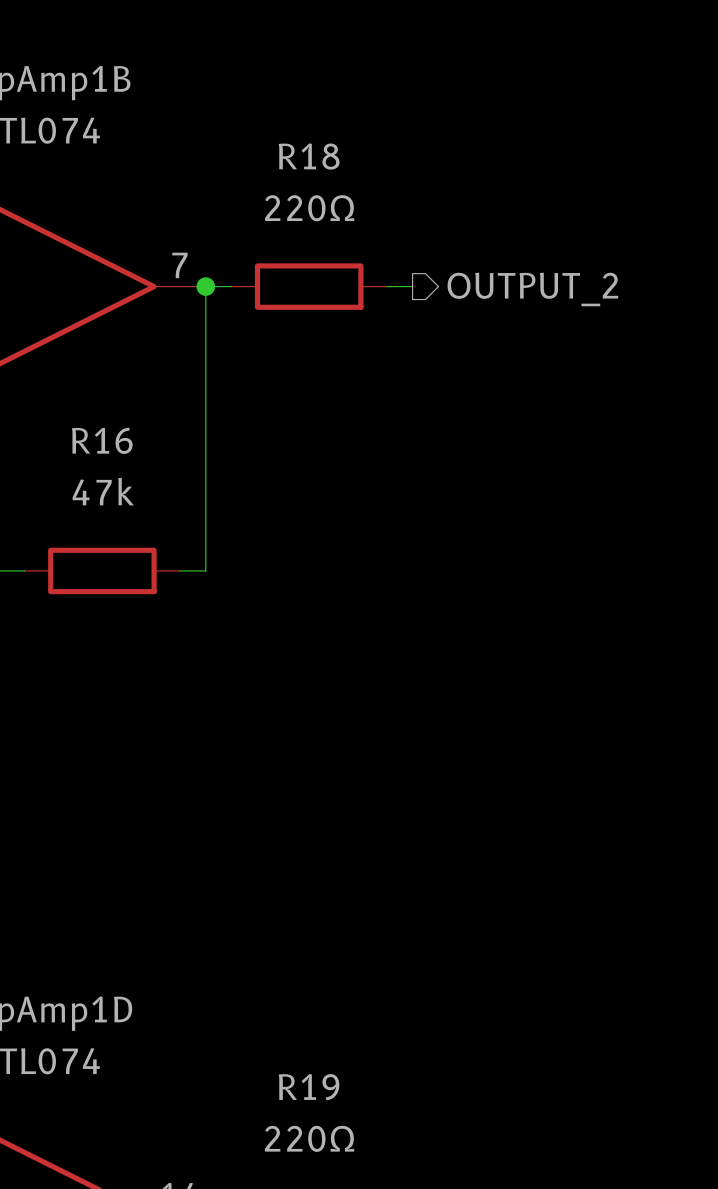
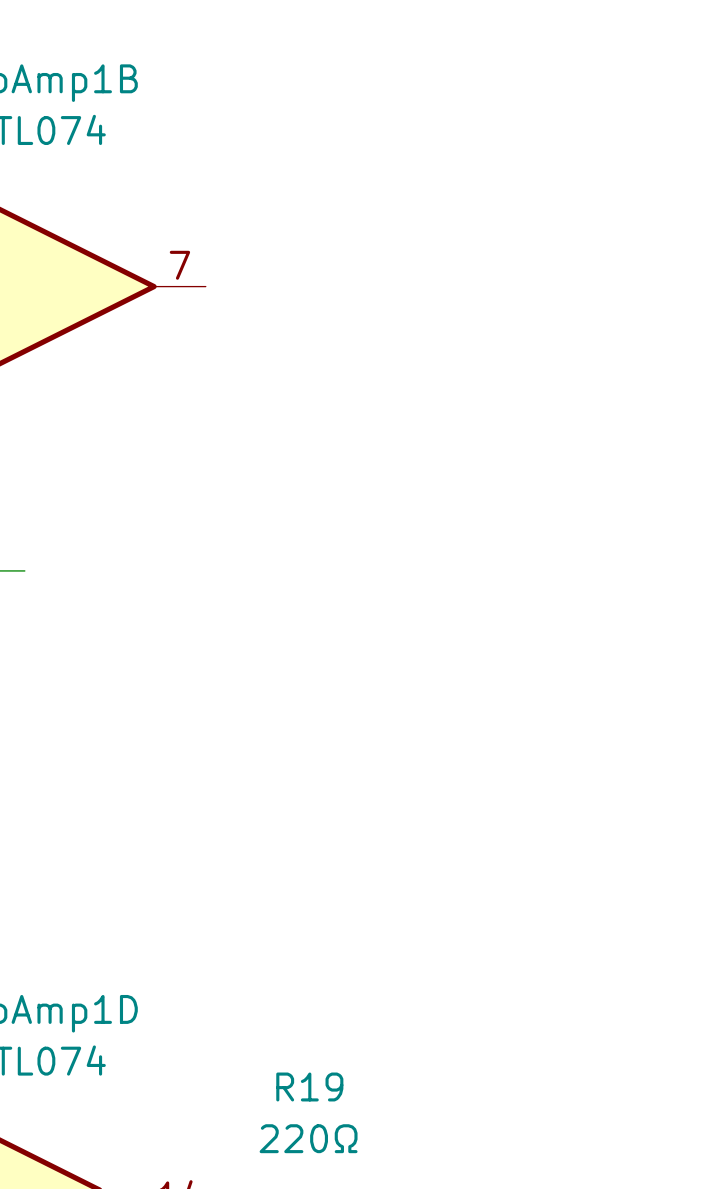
junction: (205, 286) -> none
wire: (231, 286) (205, 286) (205, 570) (179, 570) -> none
R18: 220Ω (309, 286) -> none
wire: (386, 286) (412, 286) -> none
hierarchical label: OUTPUT_2 (532, 289) -> none
R16: 47k (102, 570) -> none

